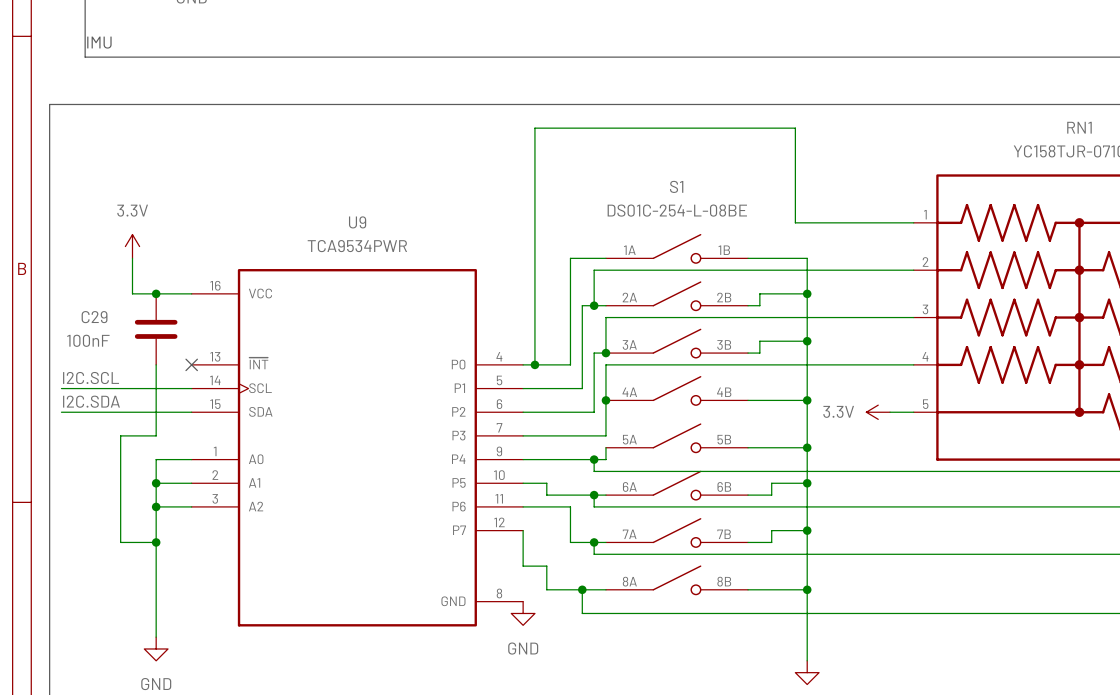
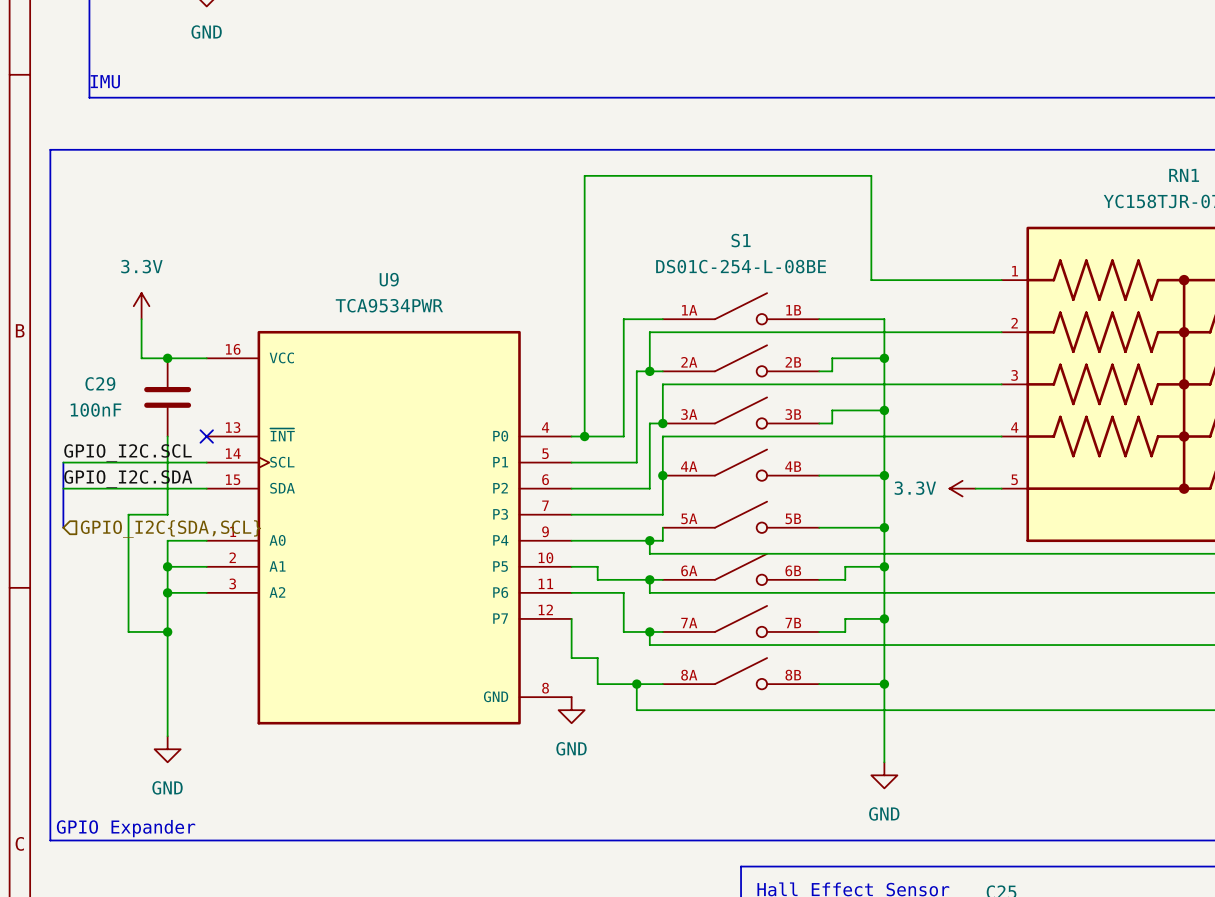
label: I2C.SCL (91, 378) -> GPIO_I2C.SCL (127, 452)
bus: none -> (63, 462) (63, 527)
label: I2C.SDA (91, 401) -> GPIO_I2C.SDA (128, 478)
hierarchical label: none -> GPIO_I2C{SDA,SCL} (170, 529)

